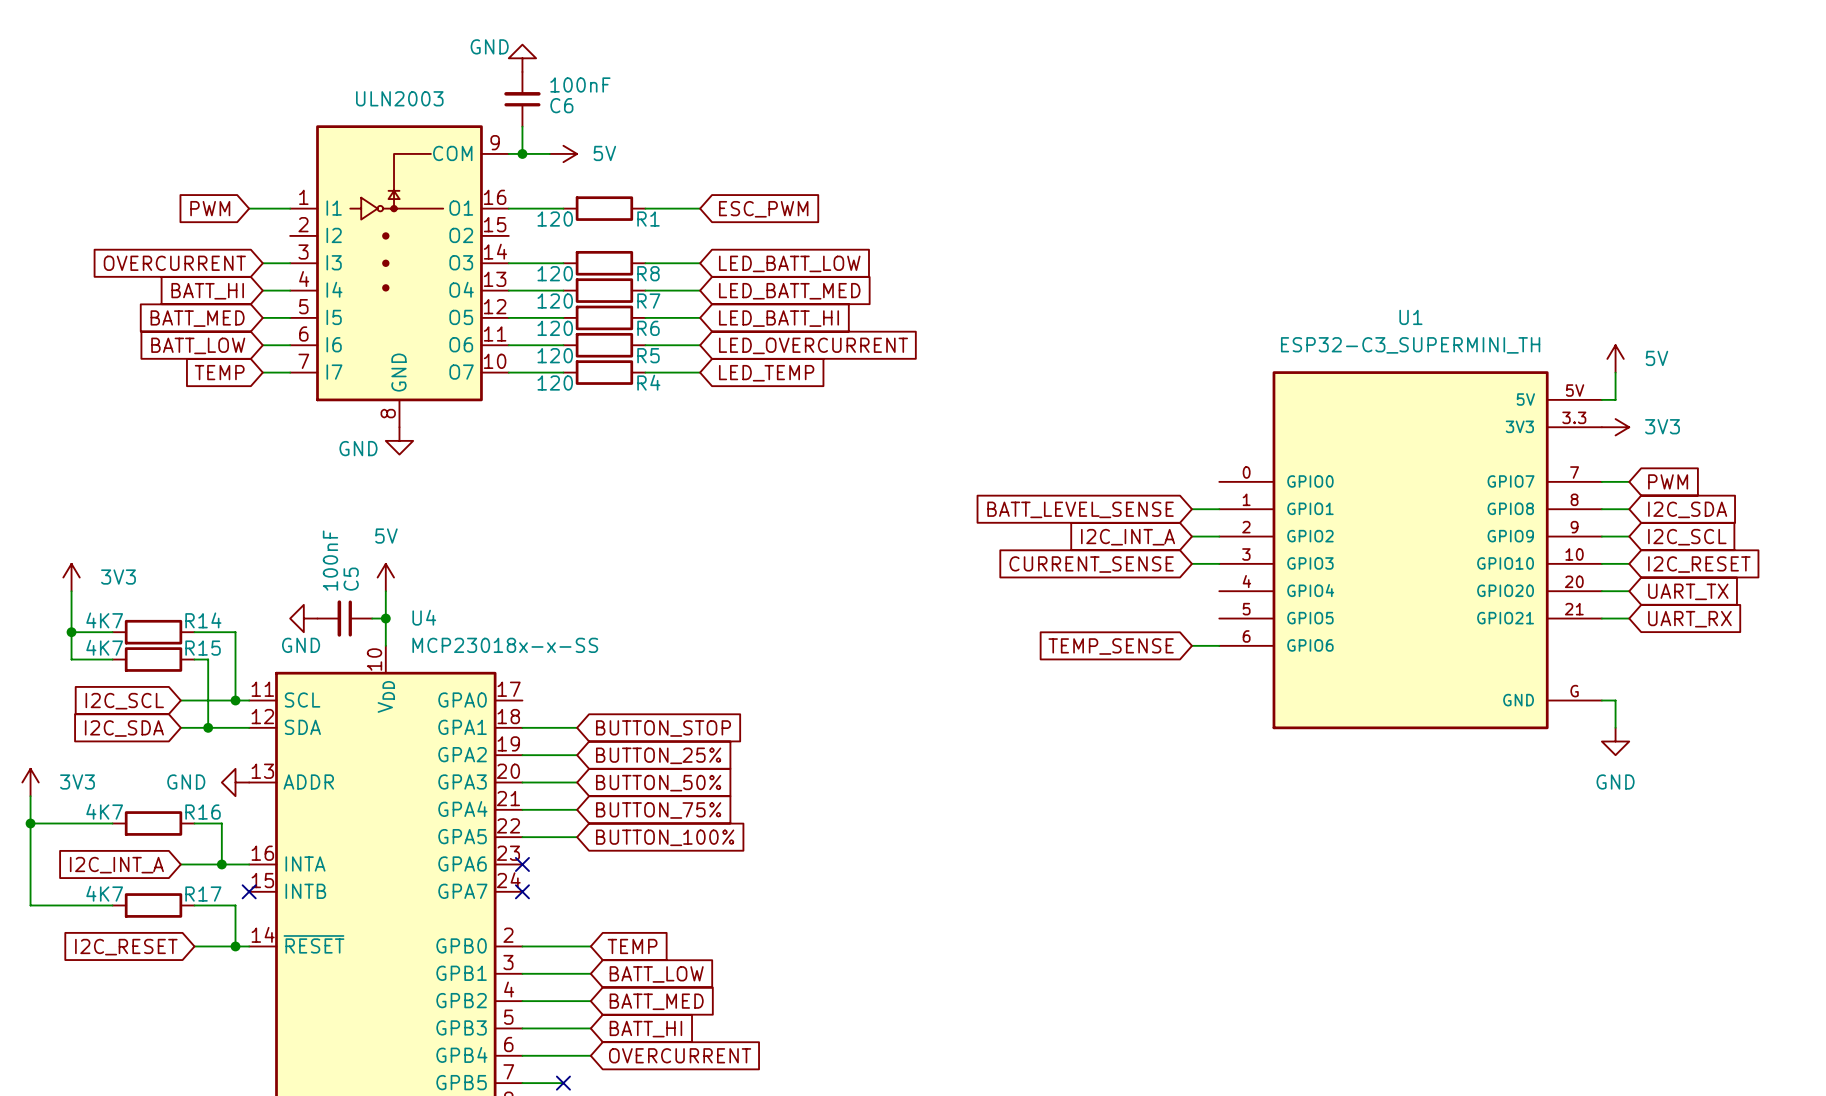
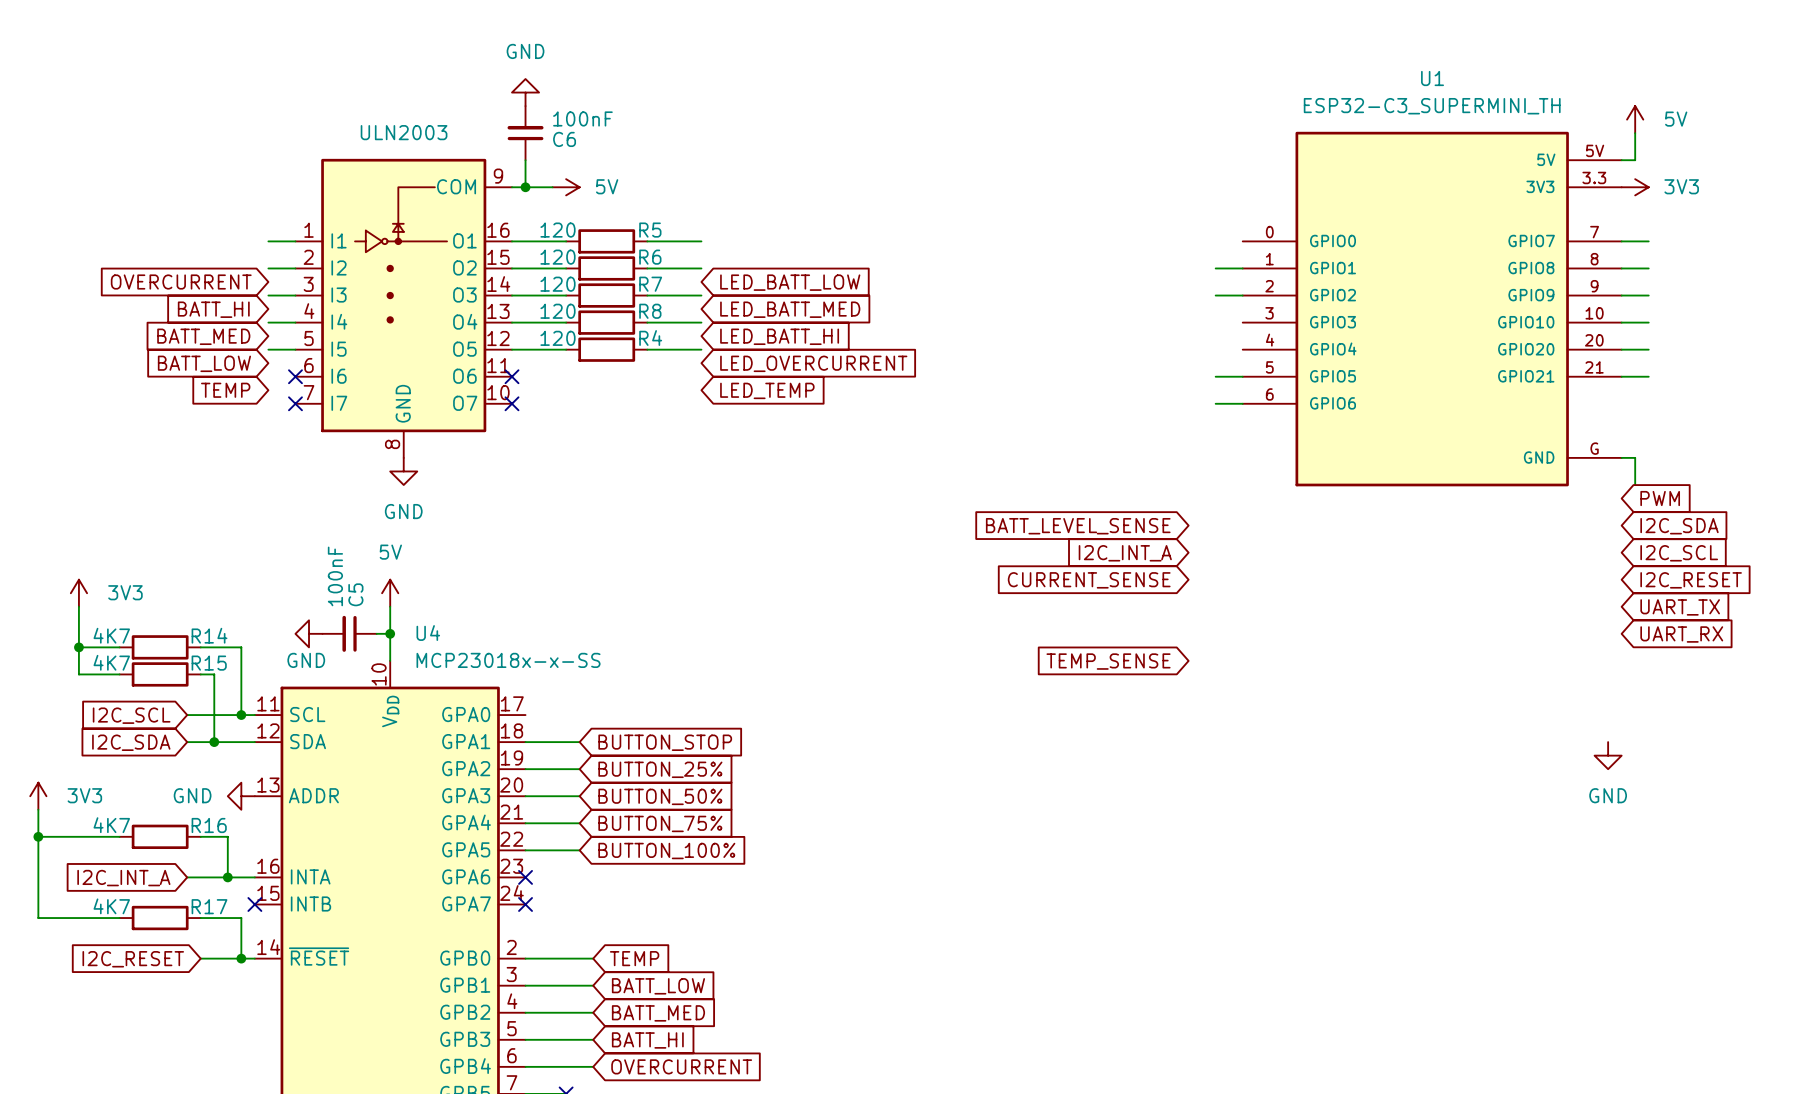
power symbol text position: GND (489, 46) -> GND (525, 51)
power symbol position: GND (522, 58) -> GND (525, 92)
C6 position: (522, 99) -> (525, 133)
wire: (508, 153) (549, 153) -> (511, 187) (552, 187)
junction position: (522, 153) -> (525, 187)
power symbol position: 5V (563, 153) -> 5V (566, 187)
global label: PWM (210, 208) -> none
wire: (249, 208) (290, 208) -> none
wire: (508, 208) (563, 208) -> none
R1: 120 (604, 208) -> none
wire: (645, 208) (700, 208) -> none
global label: ESC_PWM (763, 209) -> none
wire: (262, 263) (290, 263) -> (268, 241) (295, 241)
wire: (508, 263) (563, 263) -> (511, 241) (566, 241)
R8 position: (604, 263) -> (606, 322)
wire: (645, 263) (700, 263) -> (647, 241) (701, 241)
R8 value position: 120 (555, 273) -> 120 (558, 311)
R8 name position: R8 (648, 273) -> R8 (650, 311)
part position: (399, 276) -> (403, 308)
wire: (262, 290) (290, 290) -> (268, 268) (295, 268)
wire: (508, 290) (563, 290) -> (511, 268) (566, 268)
R7 position: (604, 290) -> (606, 295)
wire: (645, 290) (700, 290) -> (647, 268) (701, 268)
R7 value position: 120 (555, 301) -> 120 (558, 284)
R7 name position: R7 (648, 301) -> R7 (650, 284)
wire: (262, 317) (290, 317) -> (268, 295) (295, 295)
wire: (508, 317) (563, 317) -> (511, 295) (566, 295)
R6 position: (604, 317) -> (606, 268)
wire: (645, 317) (700, 317) -> (647, 295) (701, 295)
R6 value position: 120 (555, 328) -> 120 (558, 257)
R6 name position: R6 (648, 328) -> R6 (650, 257)
wire: (262, 345) (290, 345) -> (268, 322) (295, 322)
wire: (508, 345) (563, 345) -> (511, 322) (566, 322)
R5 position: (604, 345) -> (606, 241)
wire: (645, 345) (700, 345) -> (647, 322) (701, 322)
R5 value position: 120 (555, 355) -> 120 (558, 230)
R5 name position: R5 (648, 355) -> R5 (650, 230)
no-connect mark: none -> (295, 376)
no-connect mark: none -> (511, 376)
power symbol position: 5V (1615, 358) -> 5V (1635, 119)
wire: (262, 372) (290, 372) -> (268, 349) (295, 349)
wire: (508, 372) (563, 372) -> (511, 349) (566, 349)
R4 position: (604, 372) -> (606, 349)
wire: (645, 372) (700, 372) -> (647, 349) (701, 349)
wire: (1615, 372) (1615, 399) (1601, 399) -> (1635, 133) (1635, 160) (1621, 160)
R4 name position: R4 (648, 382) -> R4 (650, 338)
R4 value position: 120 (555, 383) -> 120 (558, 338)
no-connect mark: none -> (295, 403)
no-connect mark: none -> (511, 403)
power symbol position: 3V3 (1615, 427) -> 3V3 (1635, 187)
power symbol position: GND (399, 440) -> GND (403, 471)
power symbol text position: GND (358, 448) -> GND (403, 511)
wire: (1601, 481) (1629, 481) -> (1621, 241) (1648, 241)
wire: (1191, 509) (1219, 509) -> (1215, 268) (1242, 268)
wire: (1601, 509) (1629, 509) -> (1621, 268) (1648, 268)
wire: (1191, 536) (1219, 536) -> (1215, 295) (1242, 295)
wire: (1601, 536) (1629, 536) -> (1621, 295) (1648, 295)
U1 position: (1410, 550) -> (1432, 309)
wire: (1191, 563) (1219, 563) -> (1215, 376) (1242, 376)
wire: (1601, 563) (1629, 563) -> (1621, 322) (1648, 322)
wire: (1601, 591) (1629, 591) -> (1621, 349) (1648, 349)
wire: (1601, 618) (1629, 618) -> (1621, 376) (1648, 376)
wire: (1191, 645) (1219, 645) -> (1215, 403) (1242, 403)
wire: (1601, 700) (1615, 700) (1615, 727) -> (1621, 457) (1635, 457) (1635, 484)

